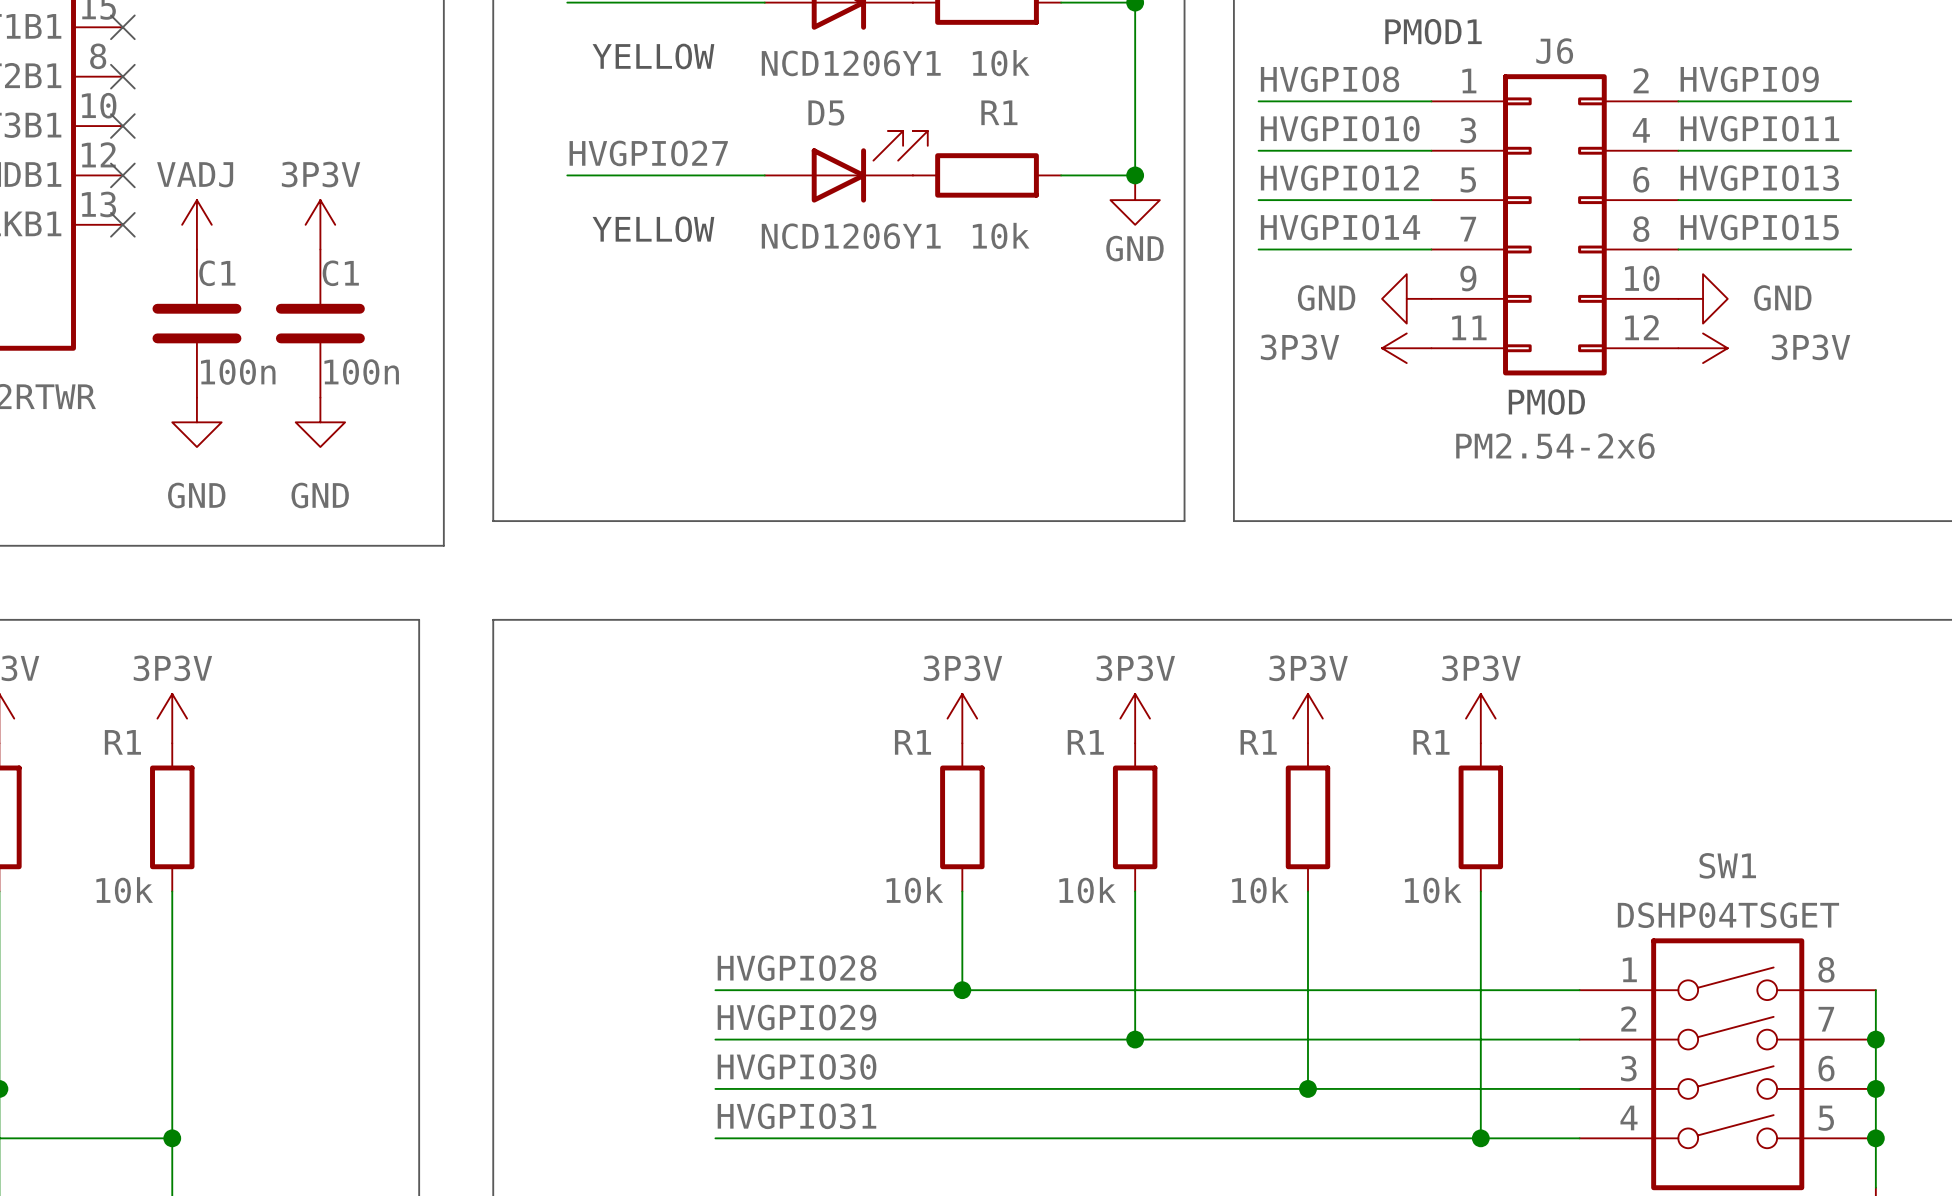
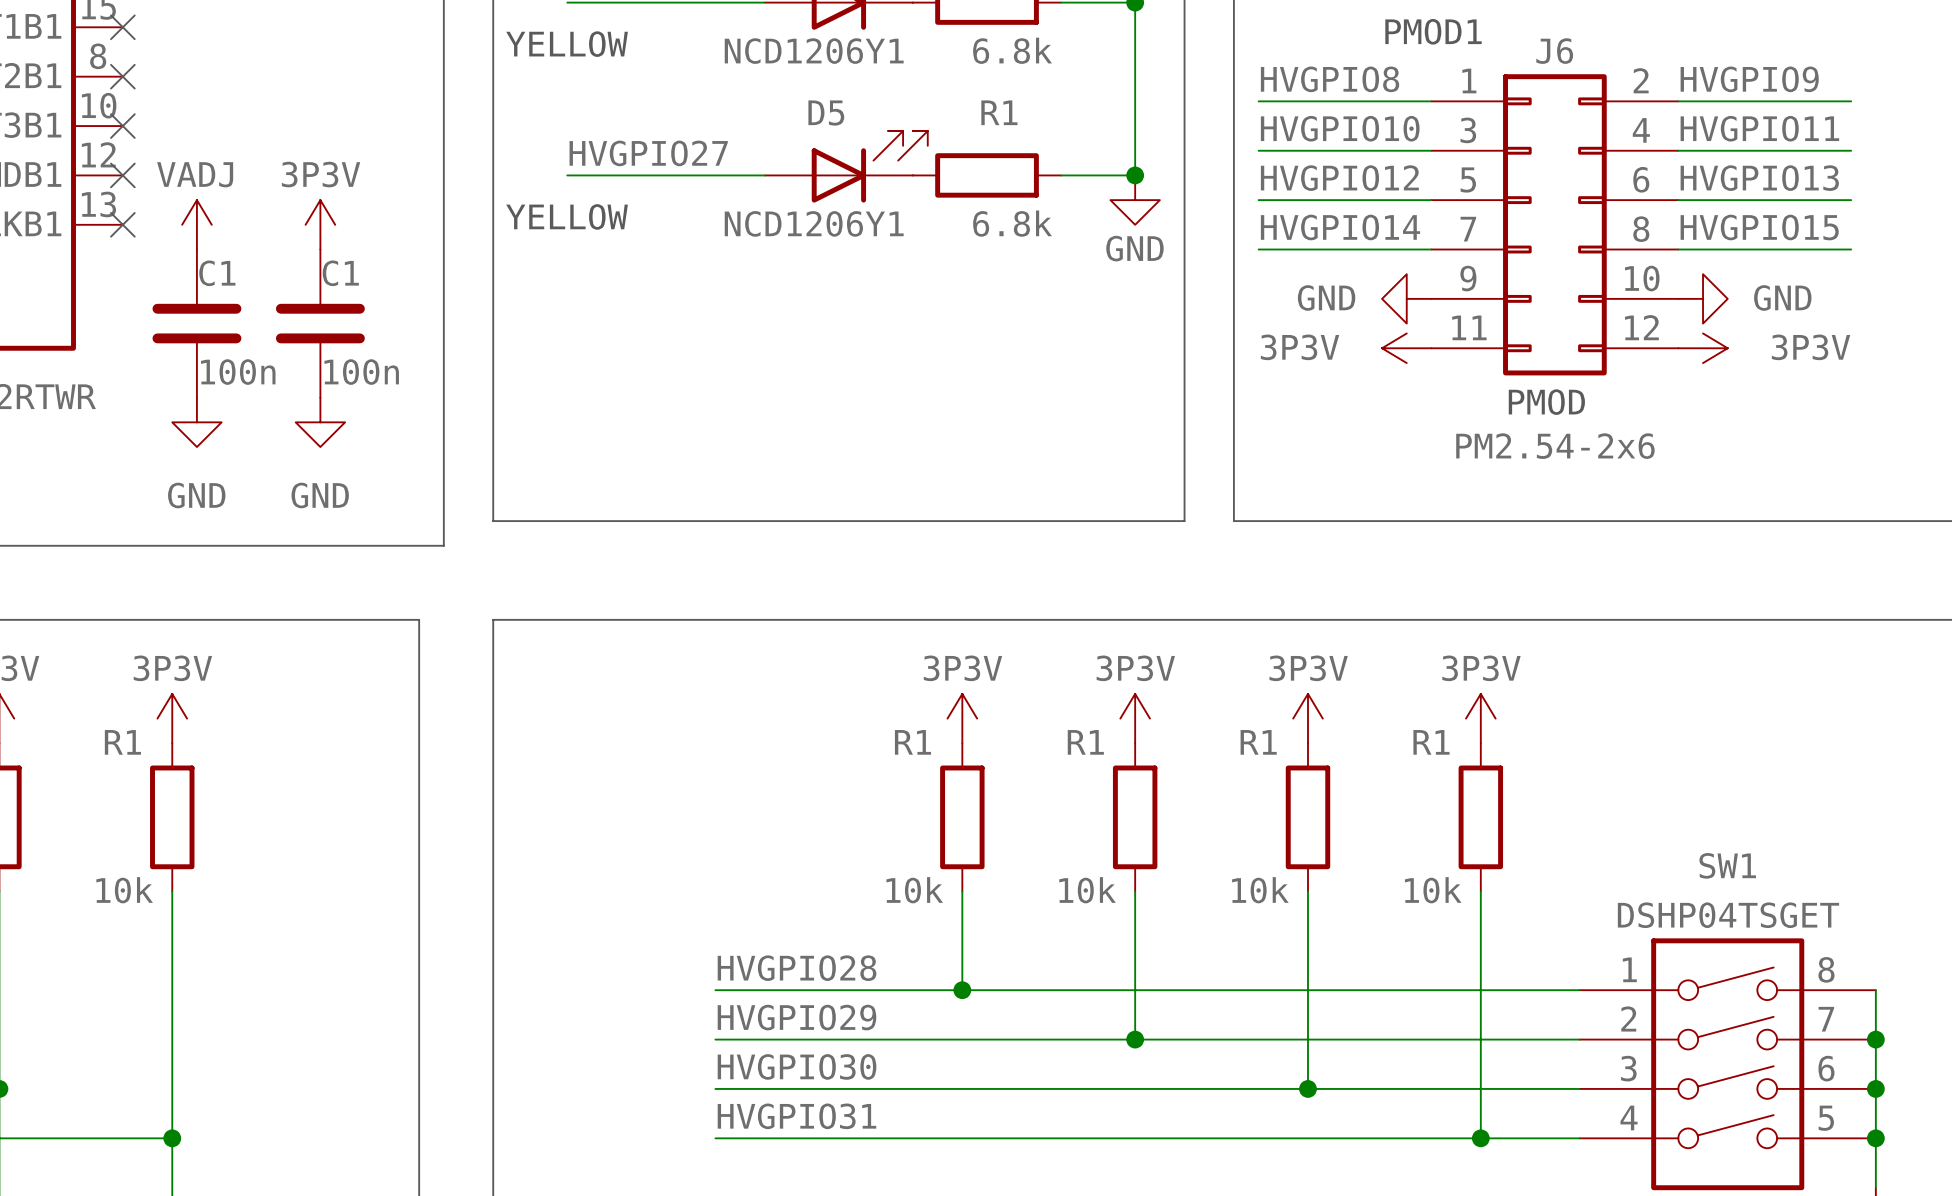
text position: YELLOW (653, 56) -> YELLOW (567, 44)
part value position: NCD1206Y1 (851, 63) -> NCD1206Y1 (814, 51)
part value: 10k (1001, 63) -> 6.8k (1012, 50)
text position: YELLOW (653, 229) -> YELLOW (567, 216)
R1 value: 10k (1001, 235) -> 6.8k (1012, 223)
D5 value position: NCD1206Y1 (851, 236) -> NCD1206Y1 (814, 223)

